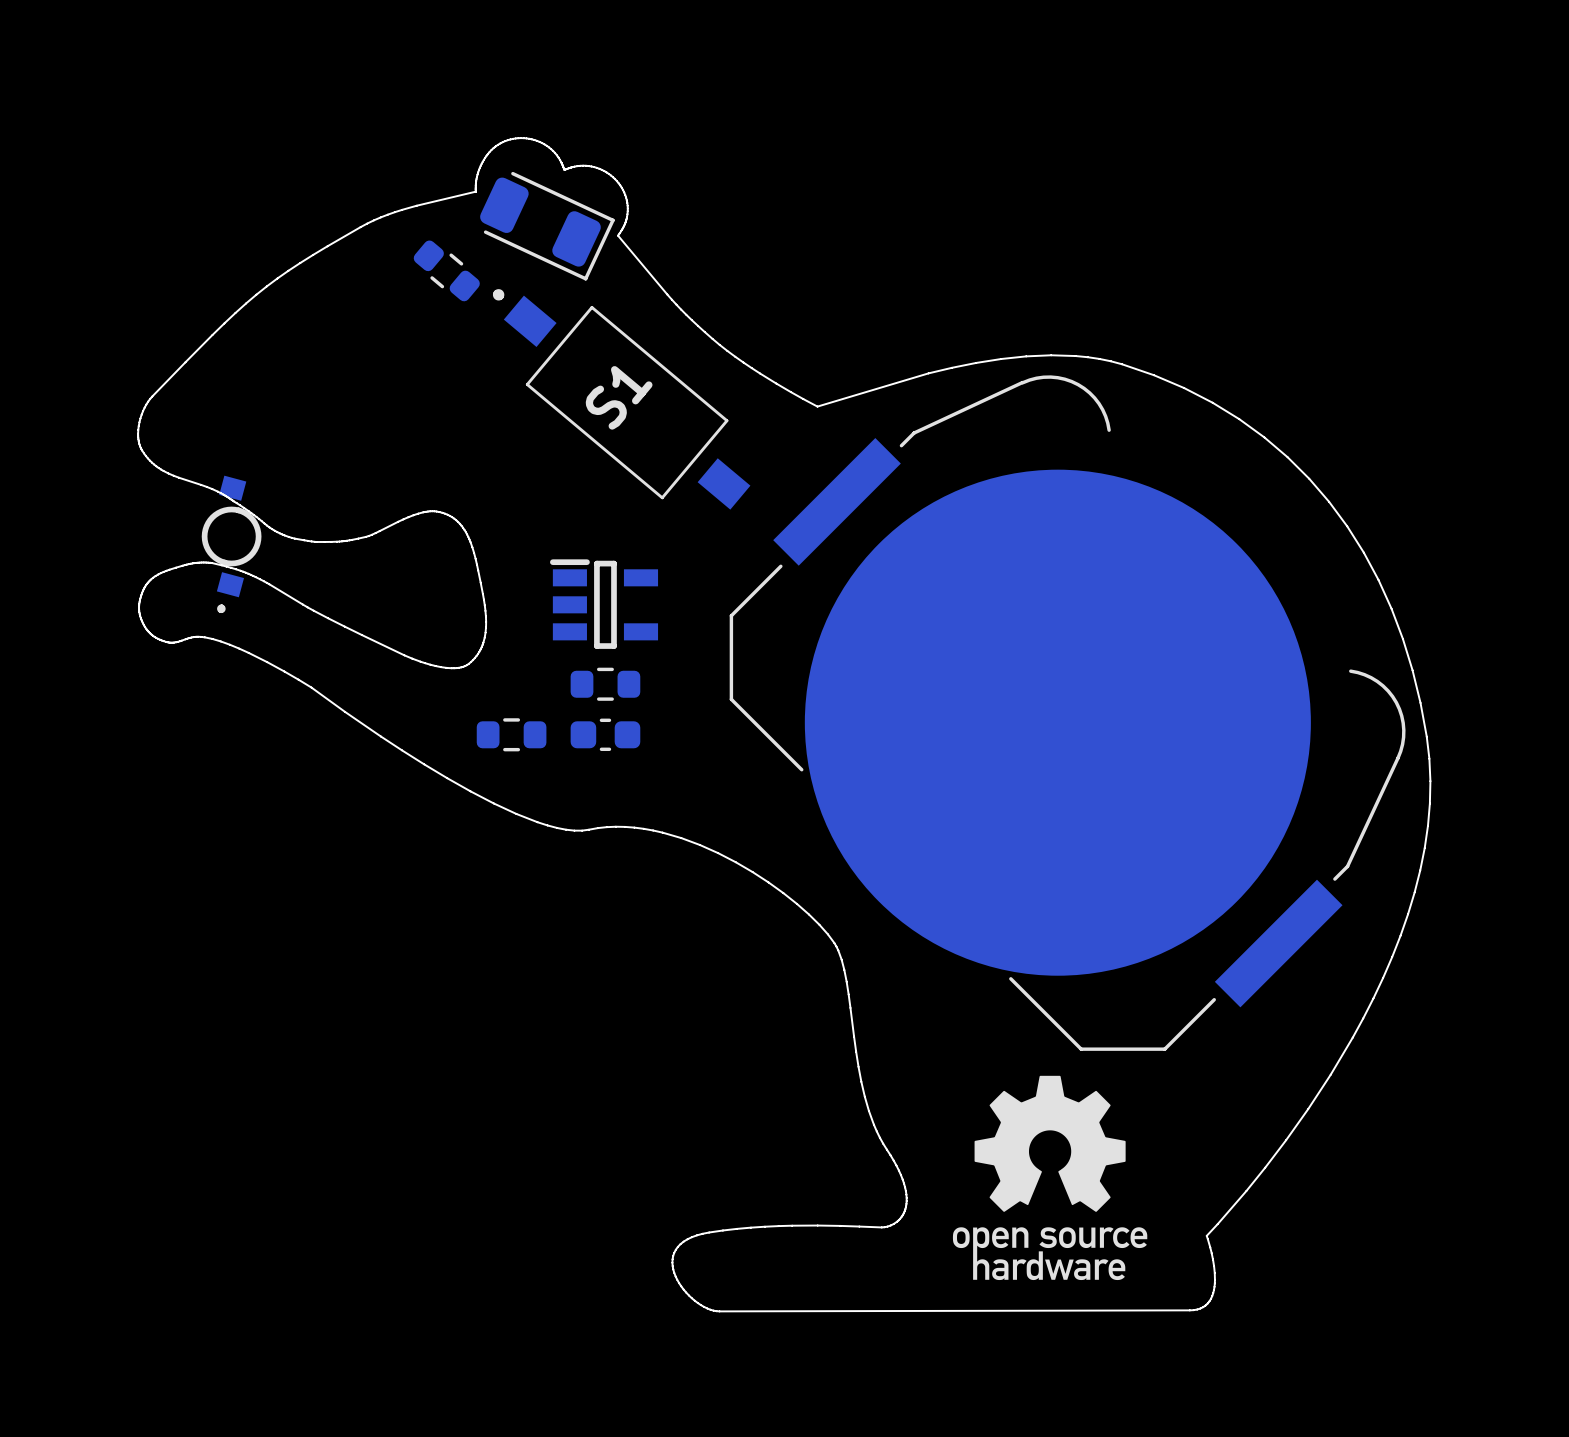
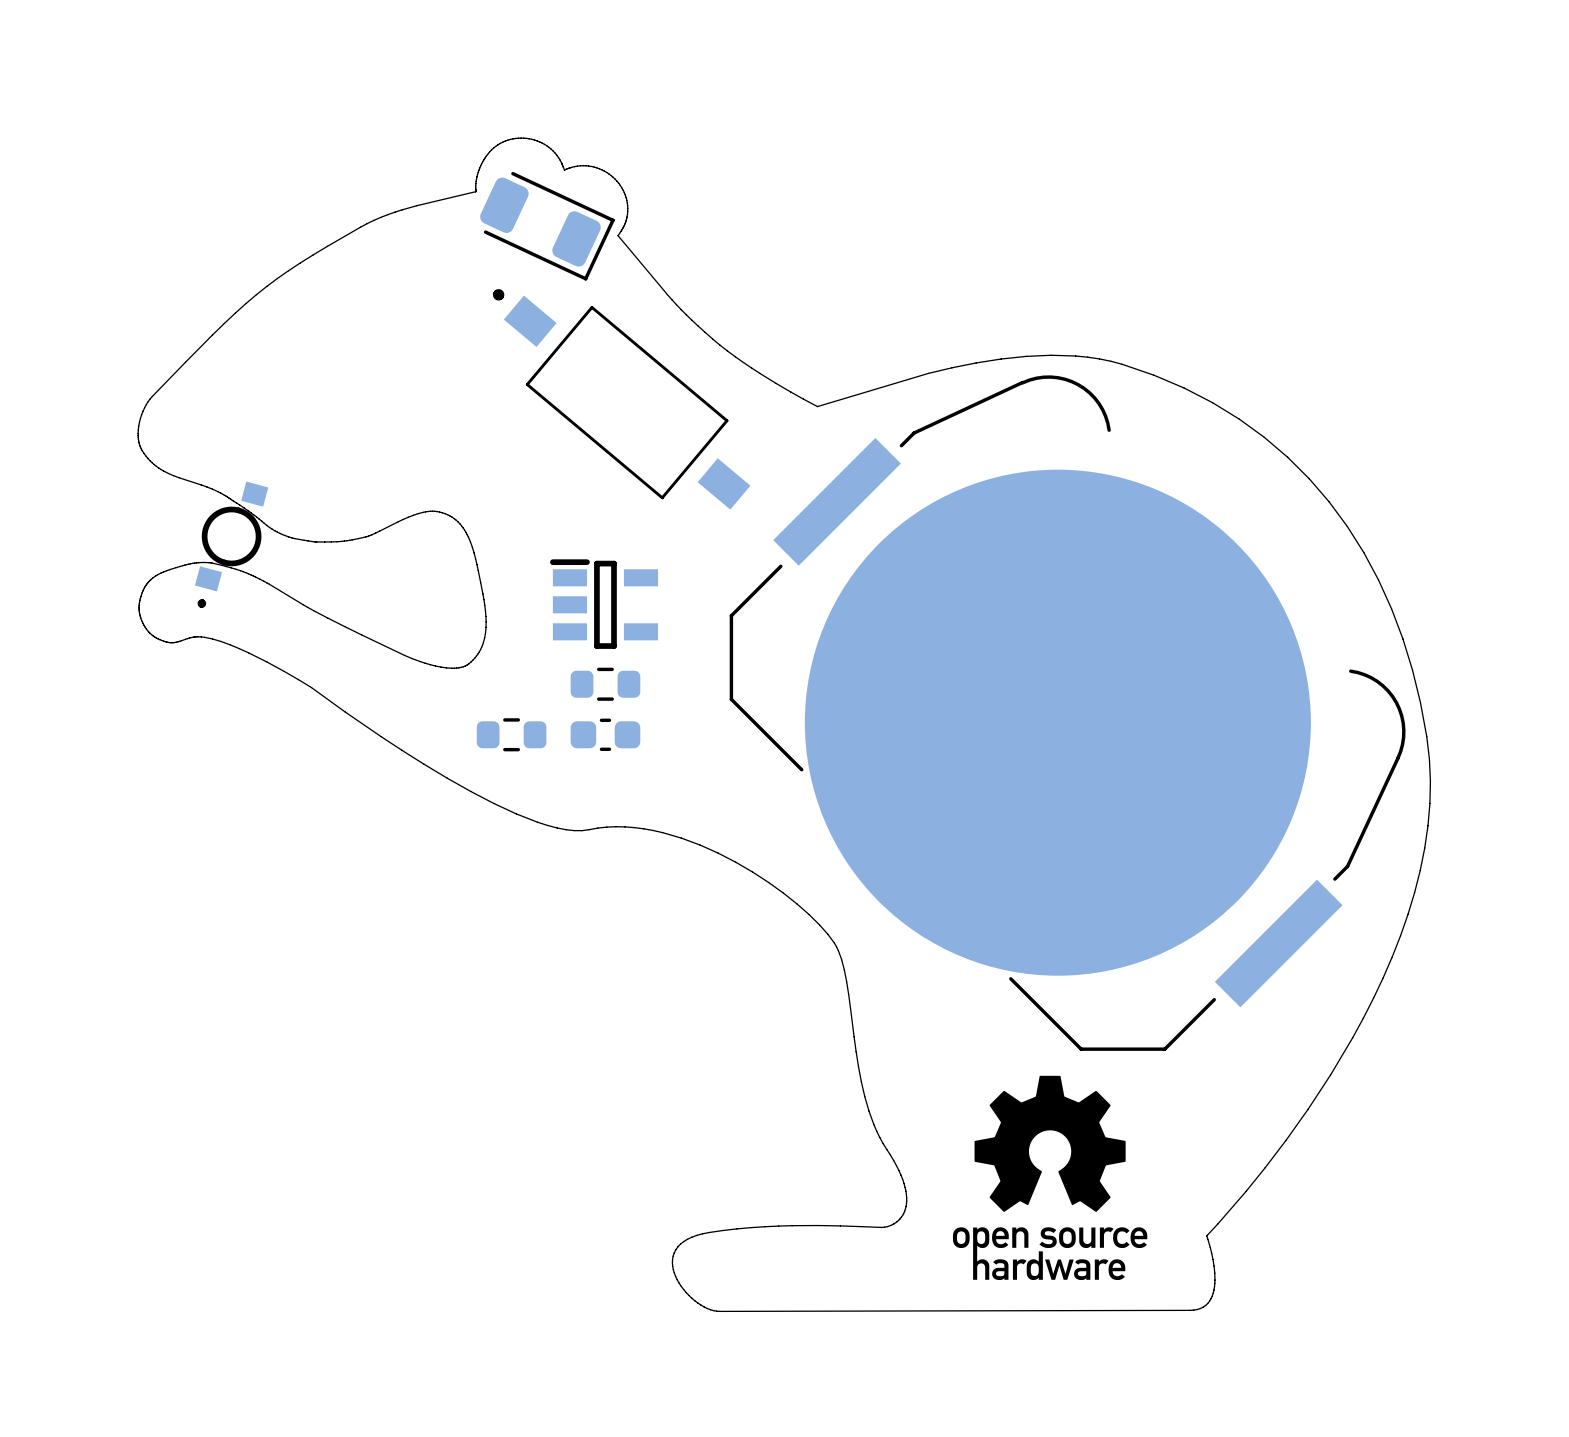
part: (446, 270) -> none
S1 name: S1 (619, 397) -> none
part footprint: [201, 475, 262, 614] -> [194, 481, 269, 608]

